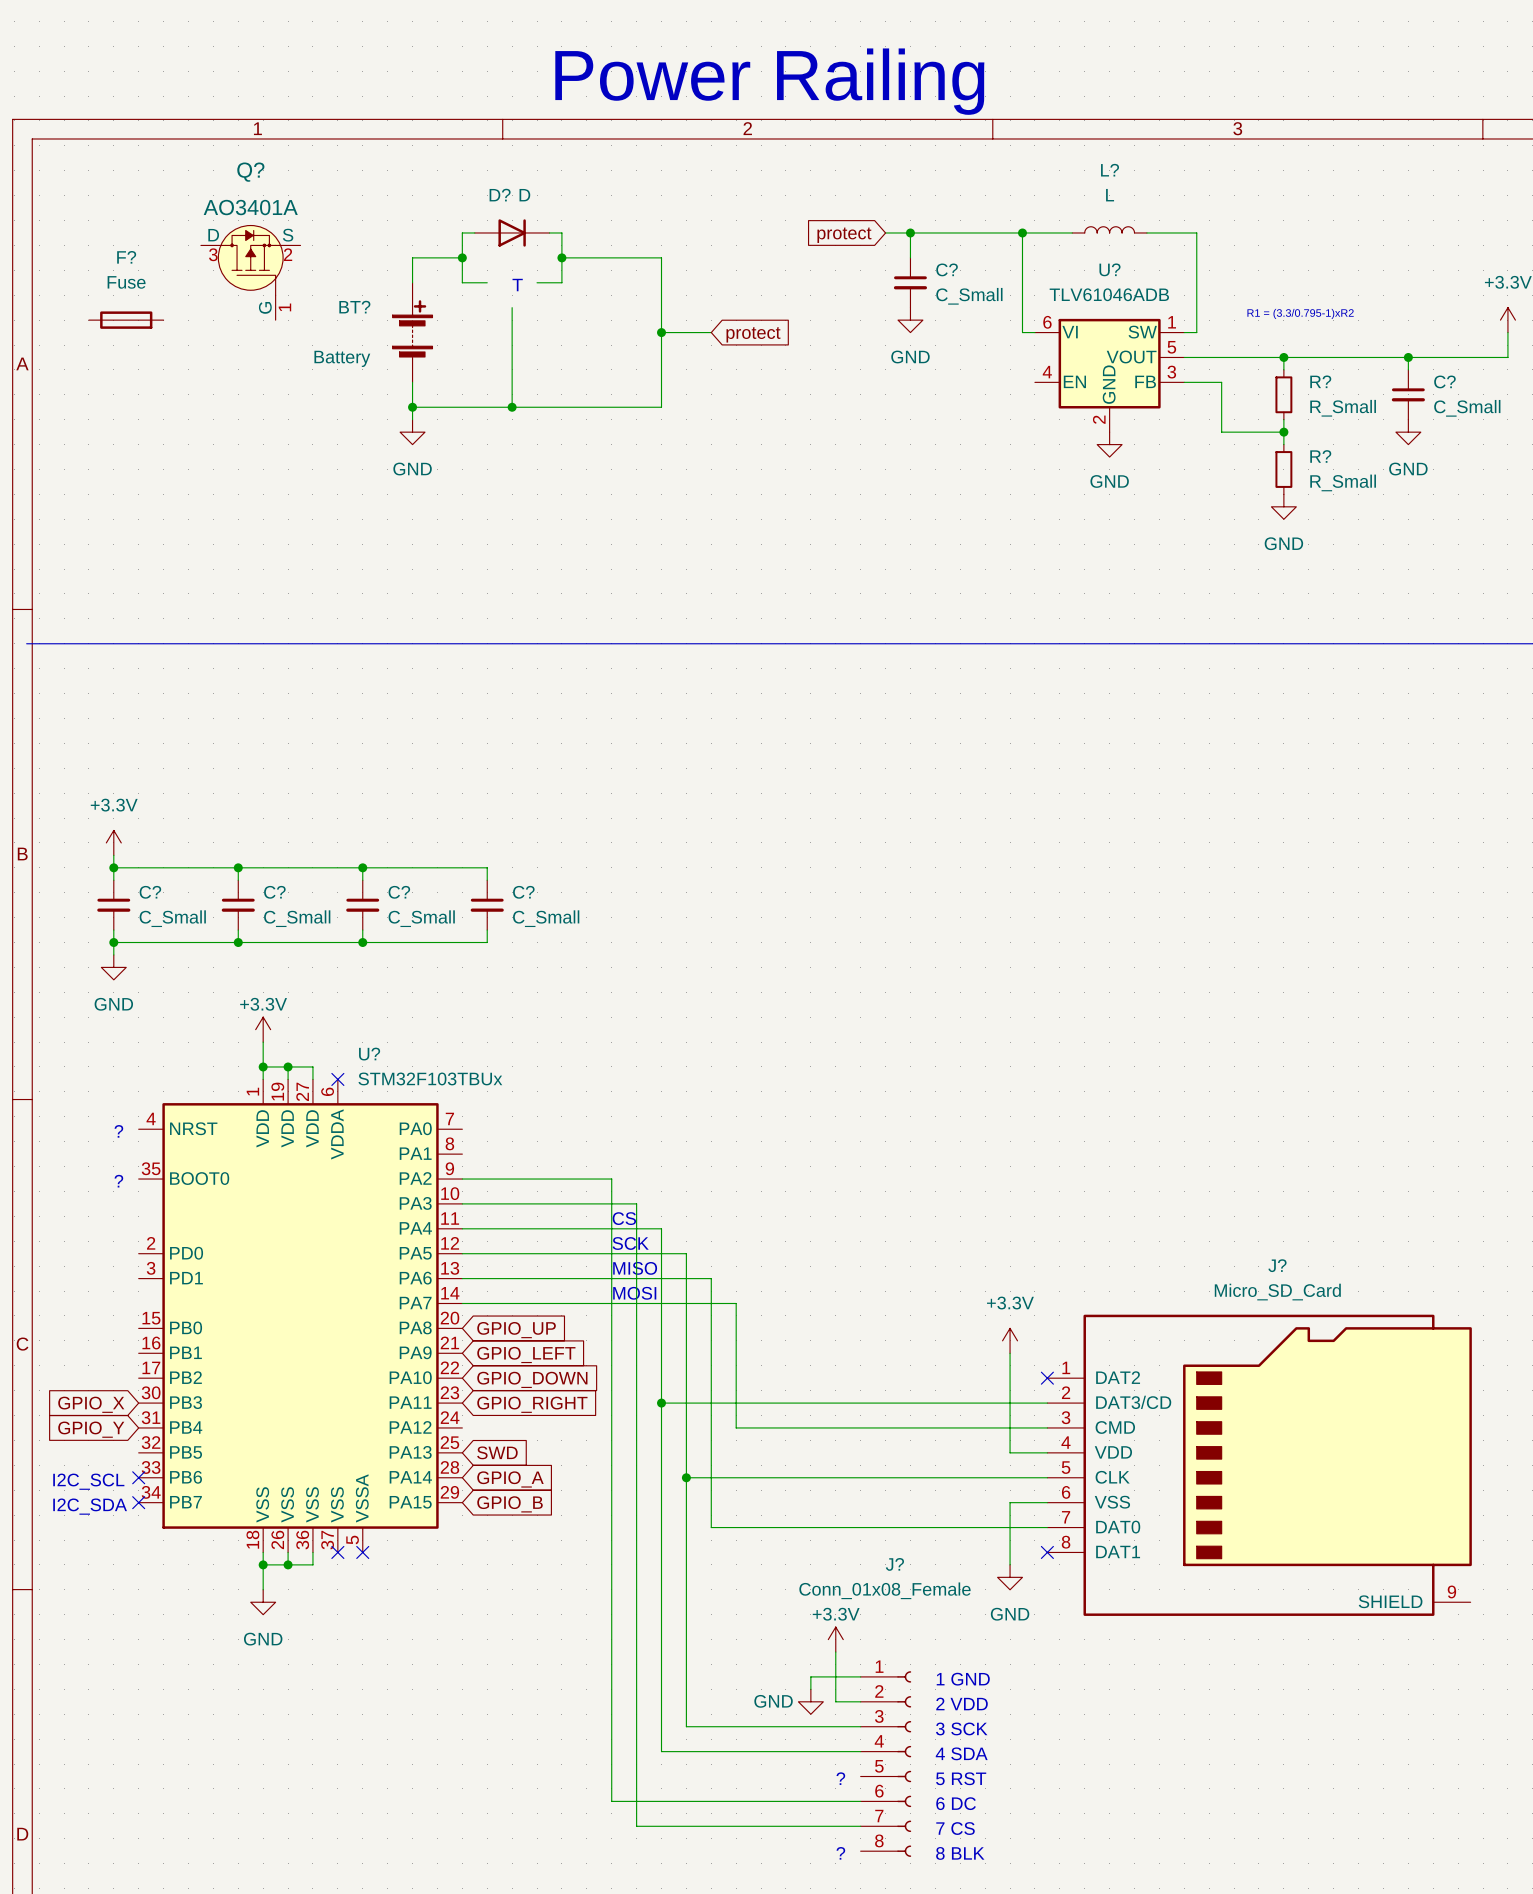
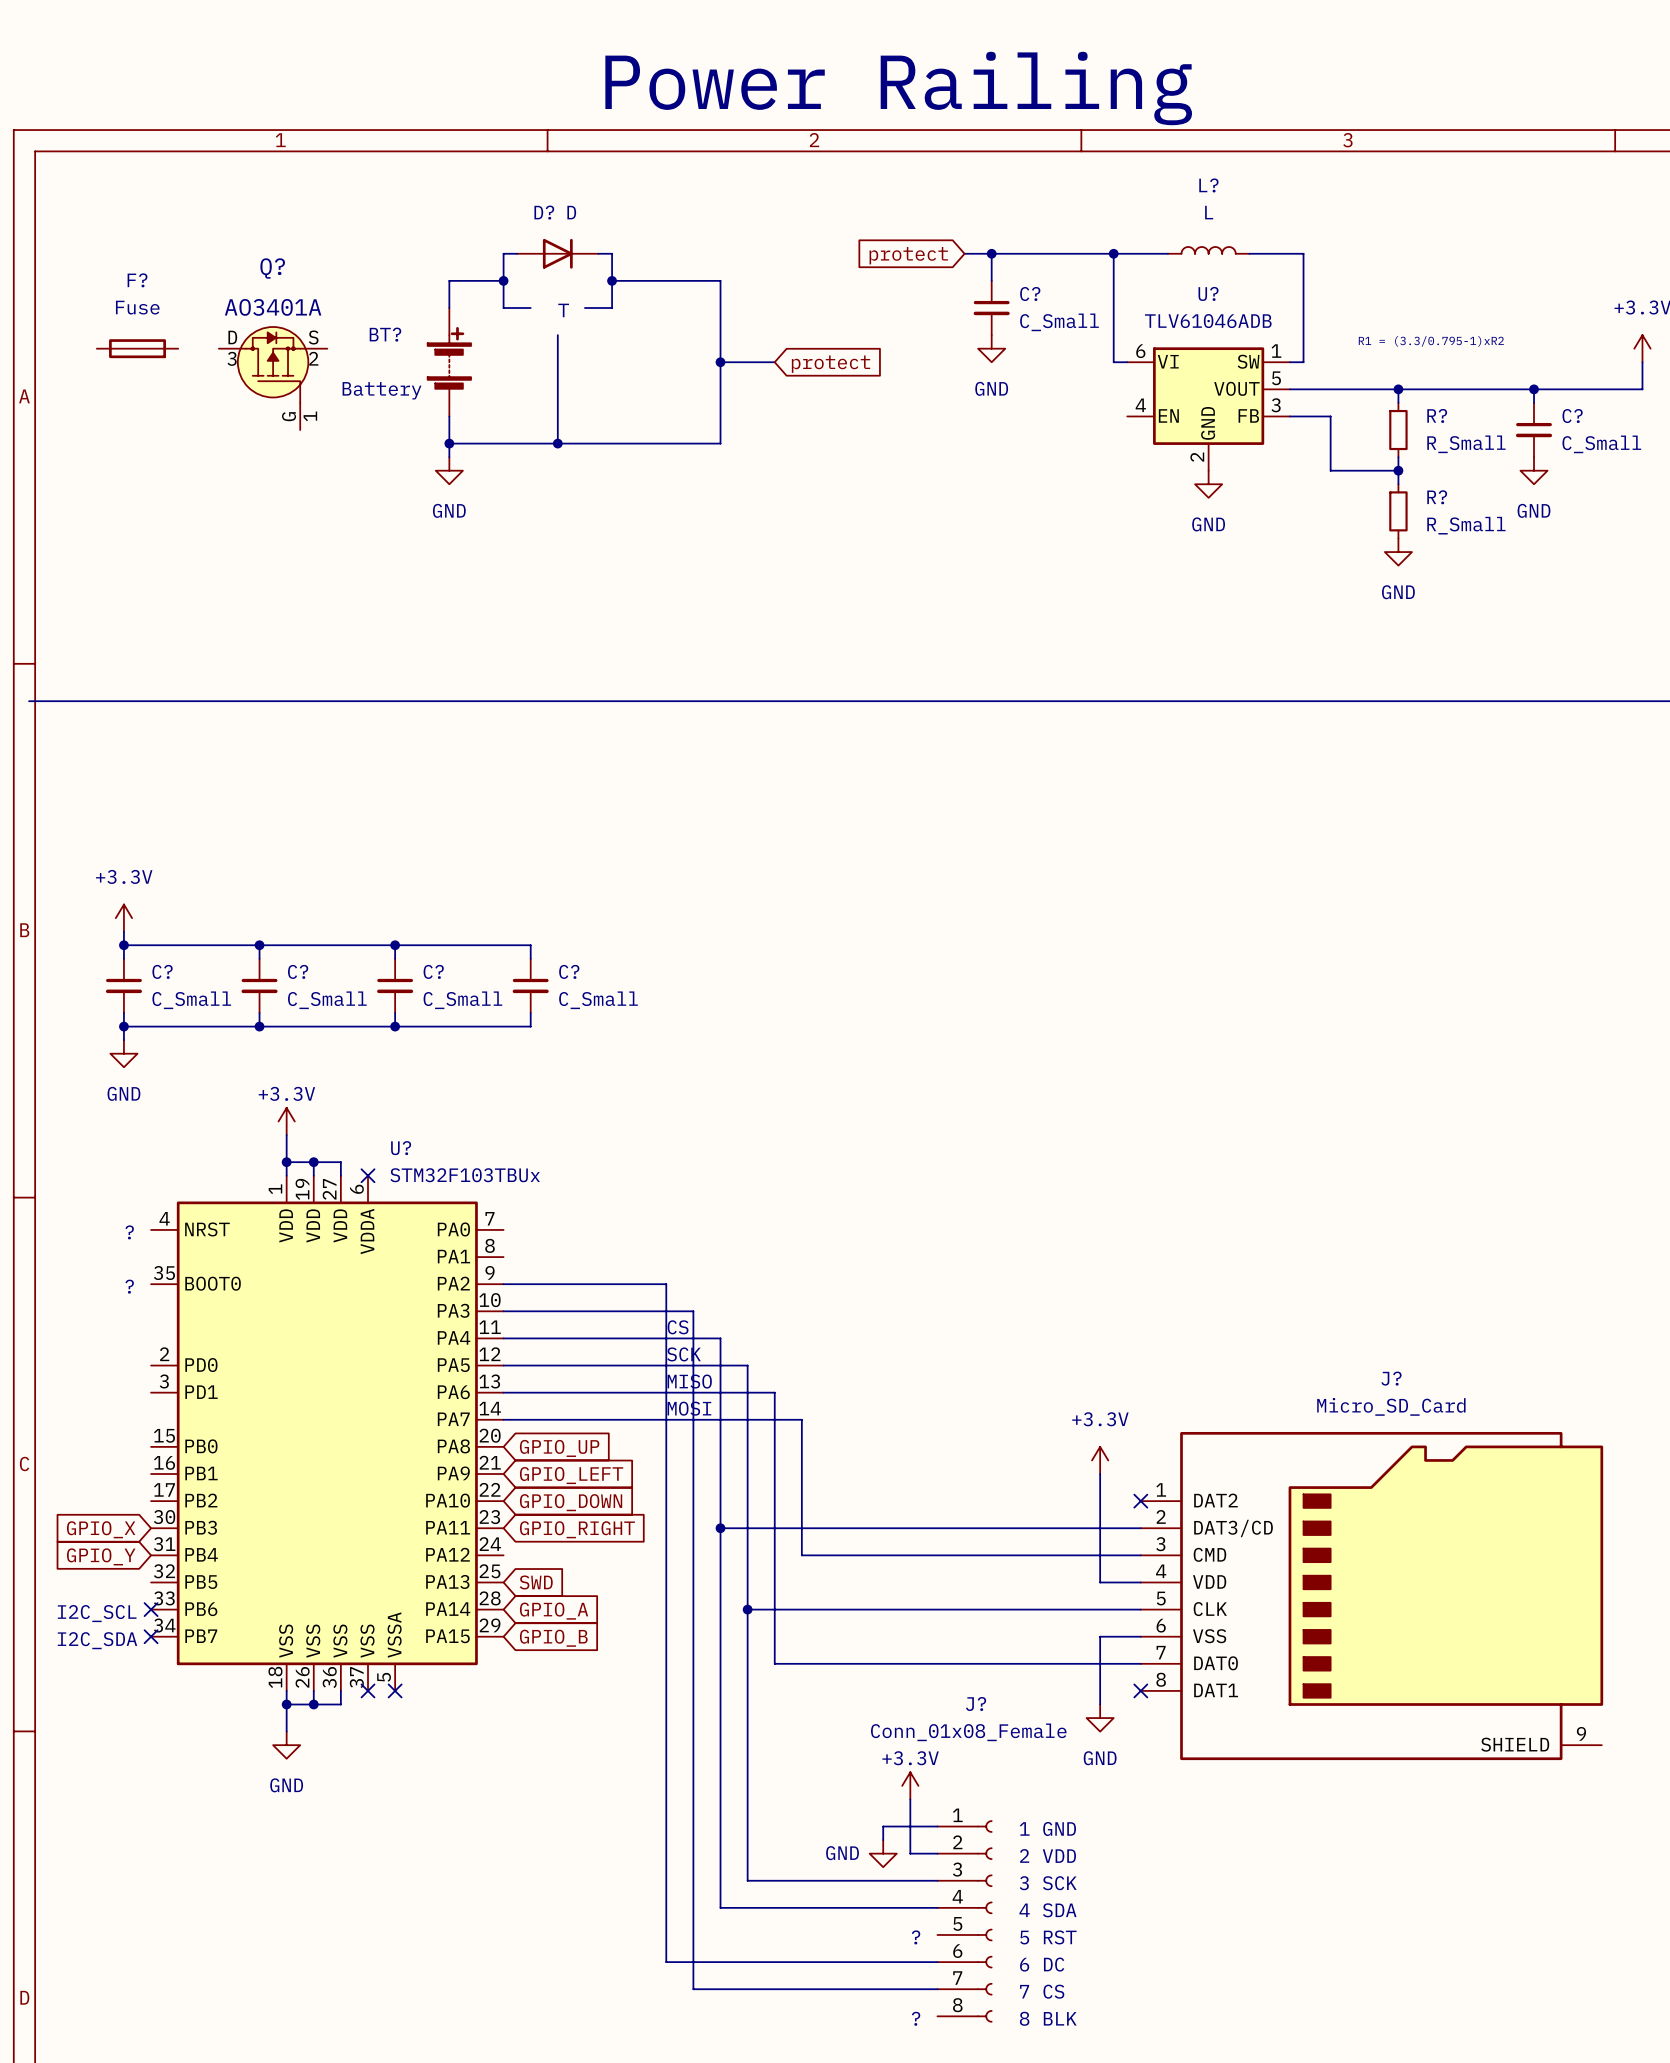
Q? position: (250, 272) -> (273, 378)

